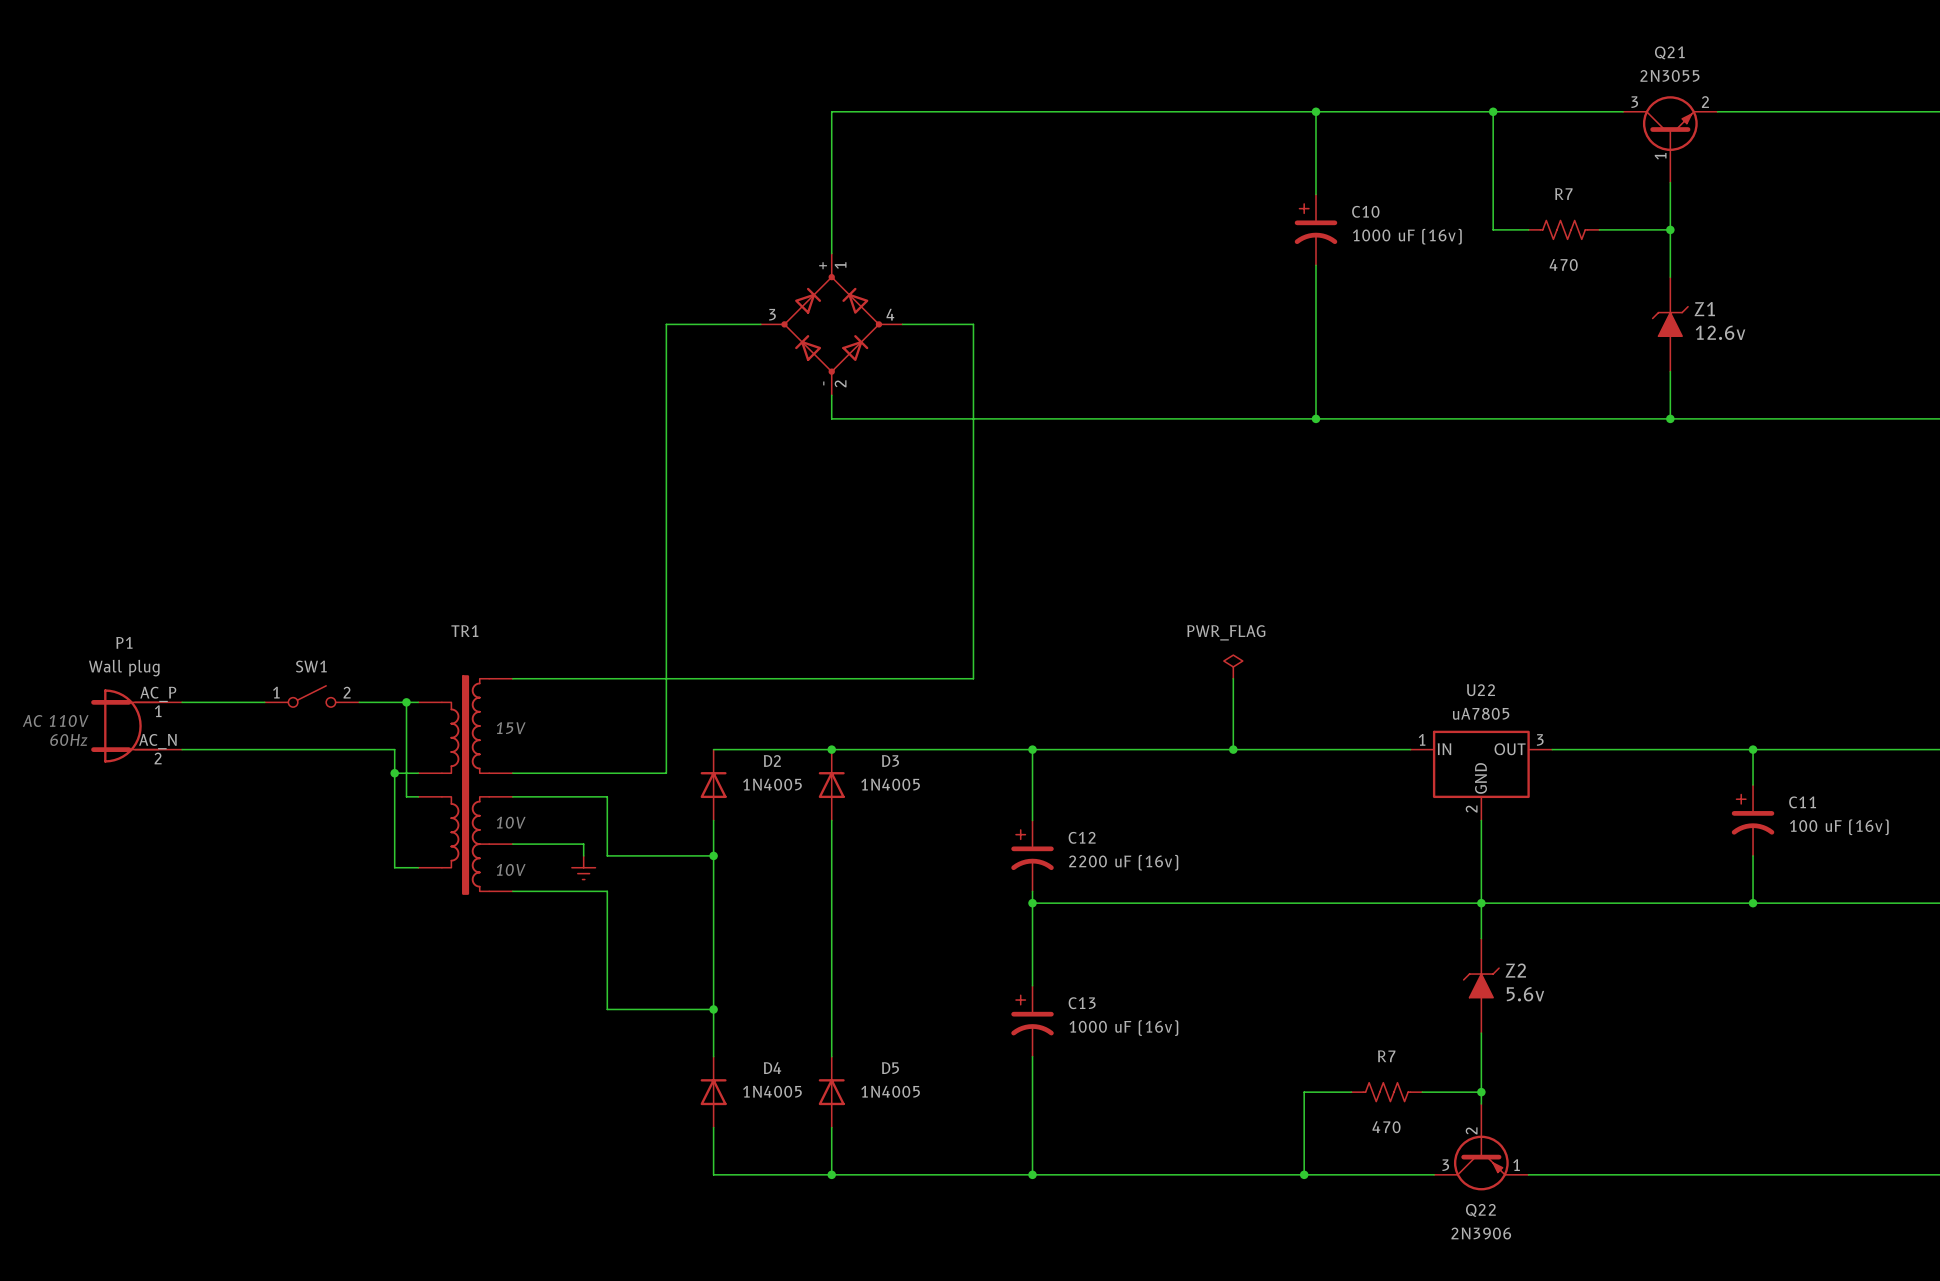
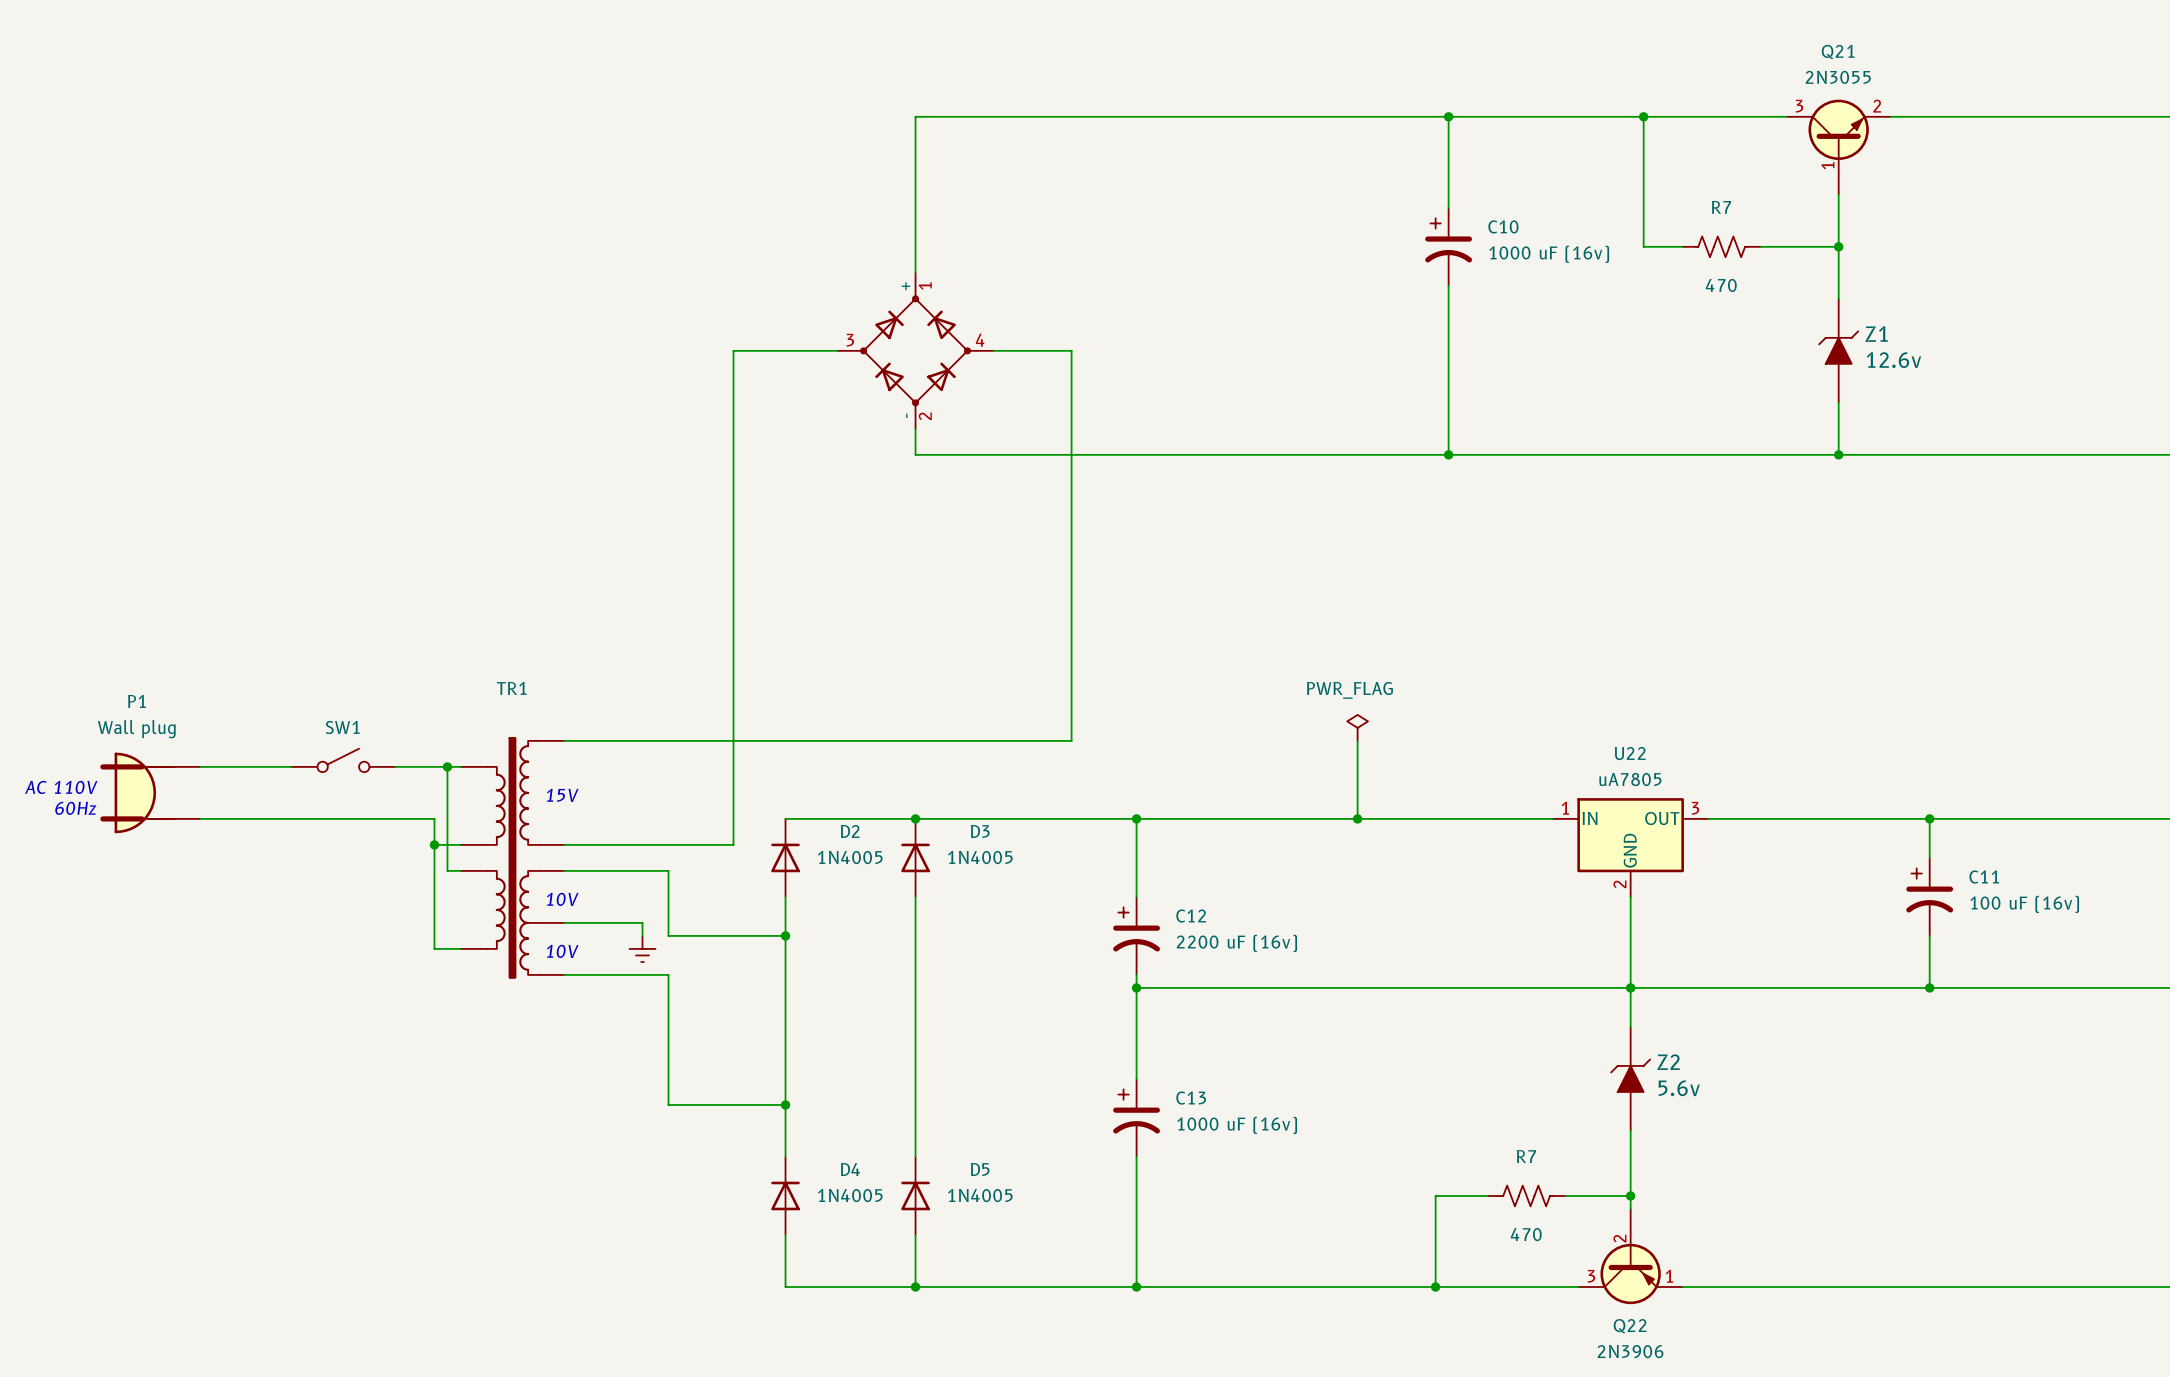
SW1 pin number: 1 (276, 692) -> none
SW1 pin number: 2 (347, 692) -> none
P1 pin name: AC_P (158, 694) -> none
P1 pin number: 1 (158, 711) -> none
P1 pin name: AC_N (157, 741) -> none
P1 pin number: 2 (158, 758) -> none

